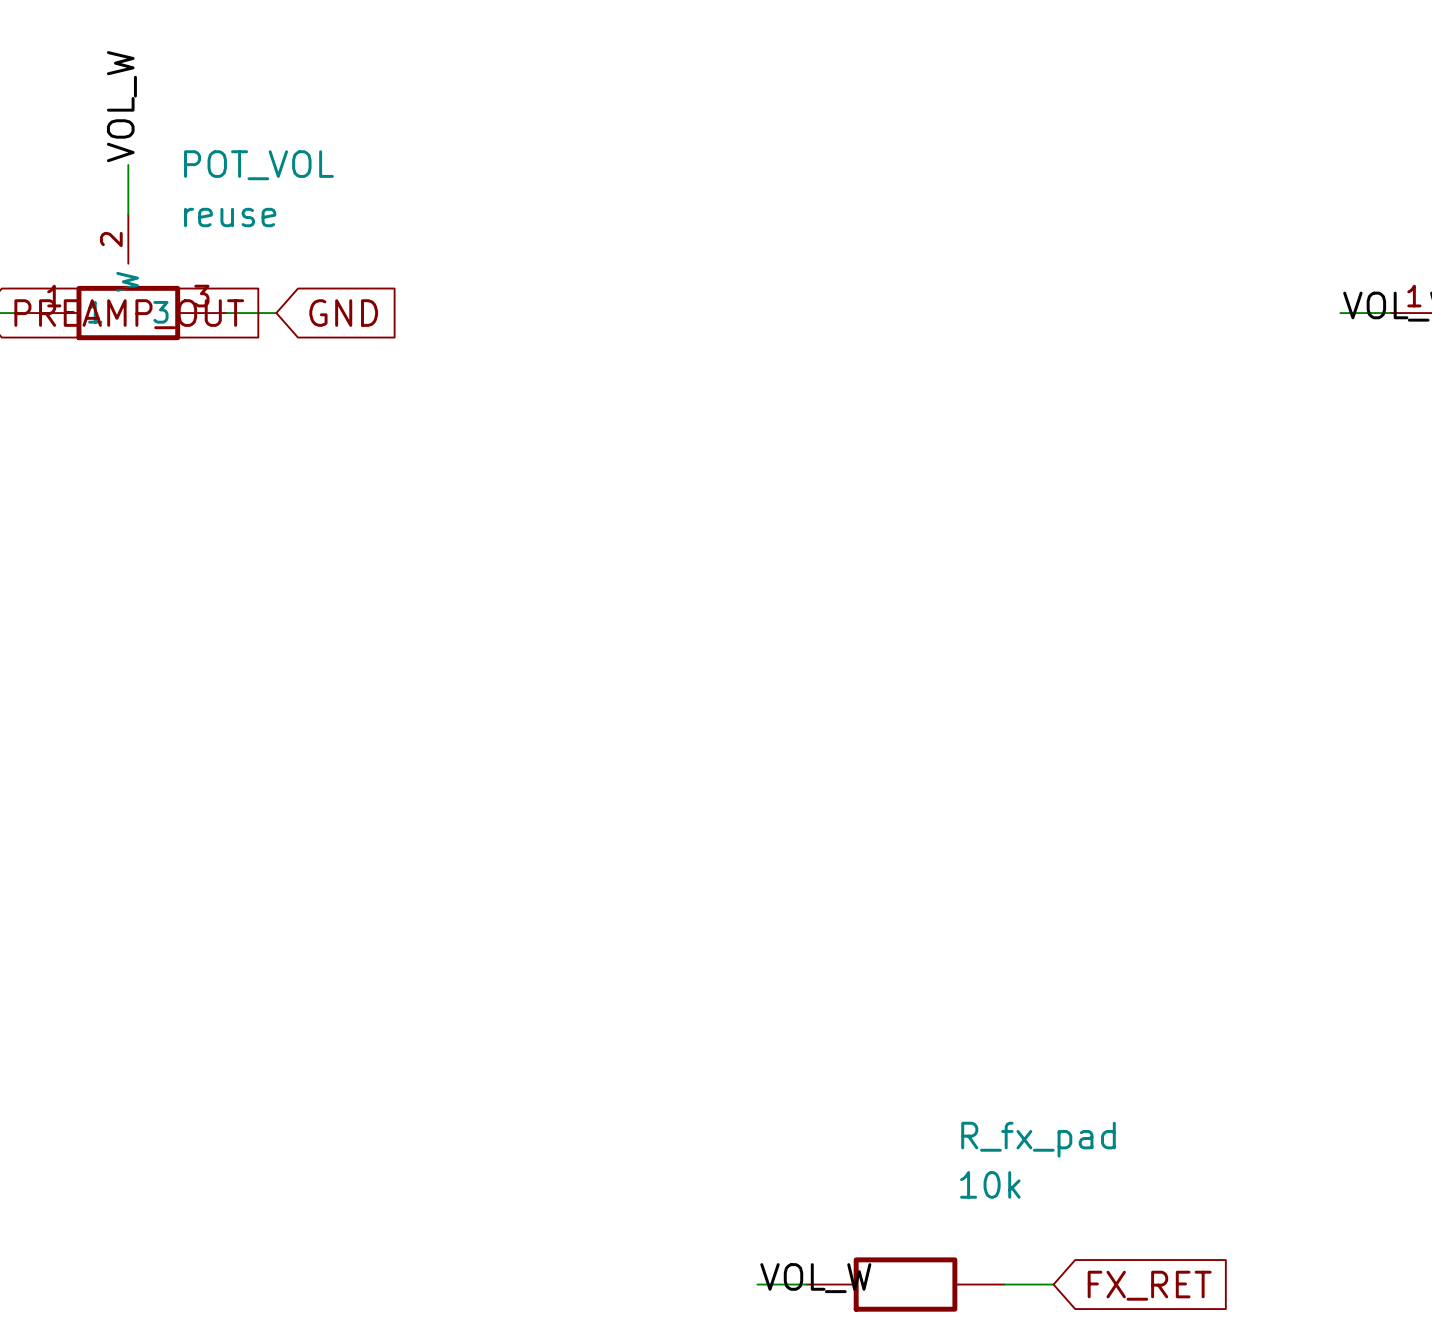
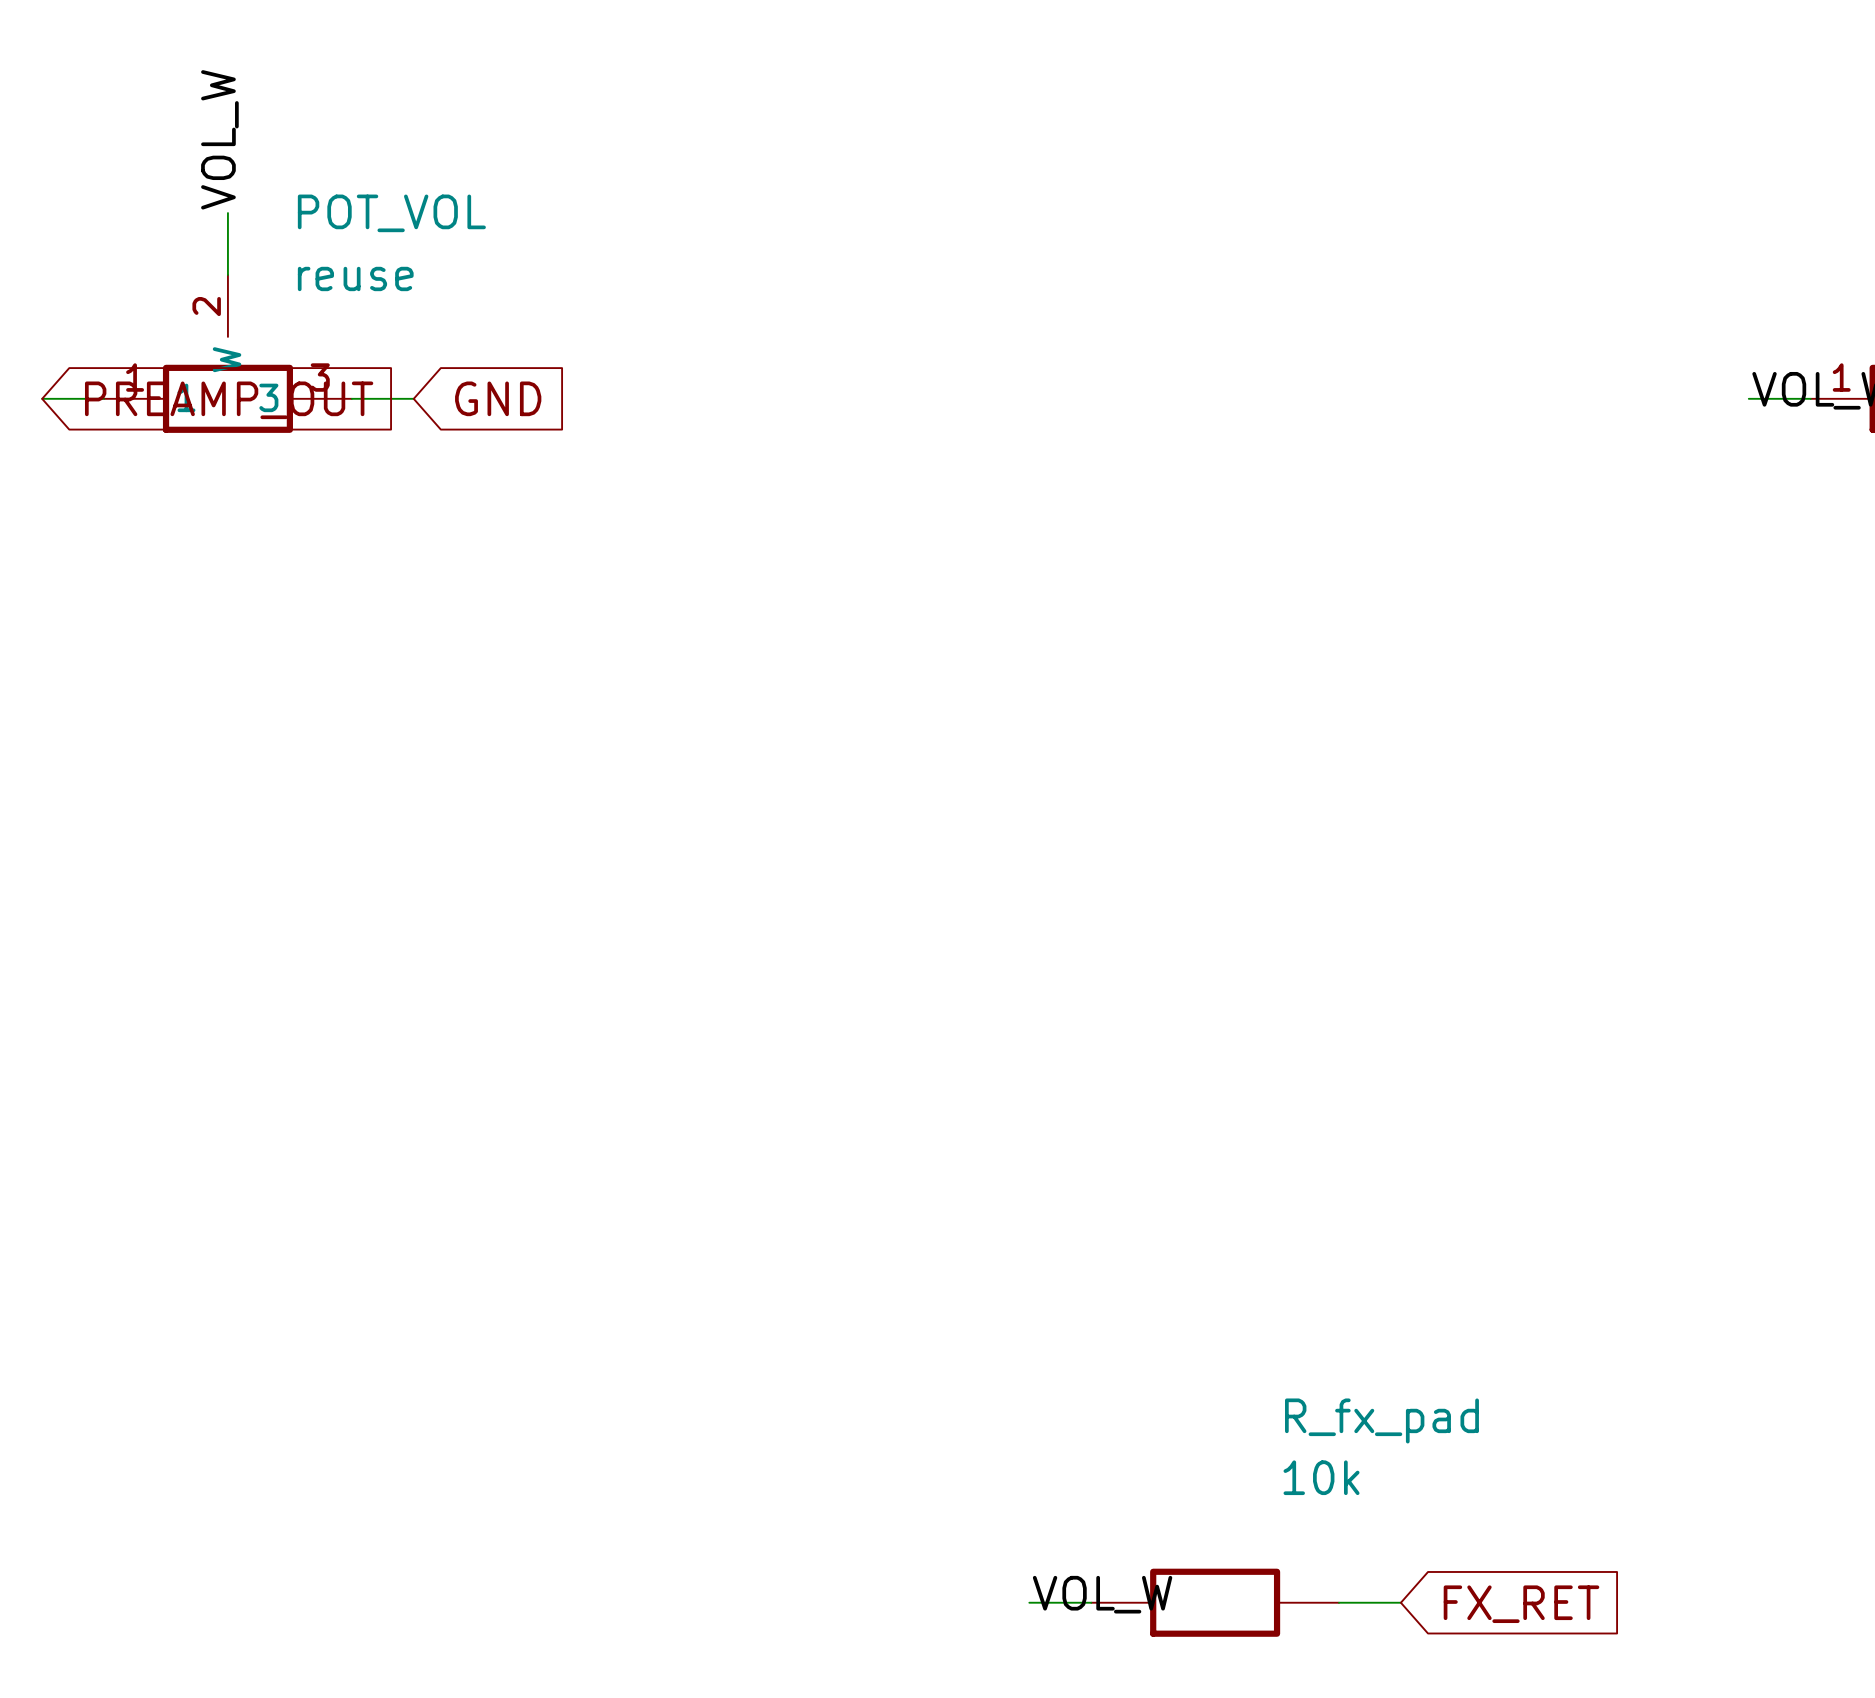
label position: VOL_W (815, 1278) -> VOL_W (1102, 1594)
wire: (757, 1284) (806, 1284) -> (1029, 1602) (1091, 1602)
R_fx_pad position: (905, 1284) -> (1215, 1602)
wire: (1004, 1284) (1053, 1284) -> (1338, 1602) (1400, 1602)
global label position: FX_RET (1149, 1285) -> FX_RET (1521, 1604)

